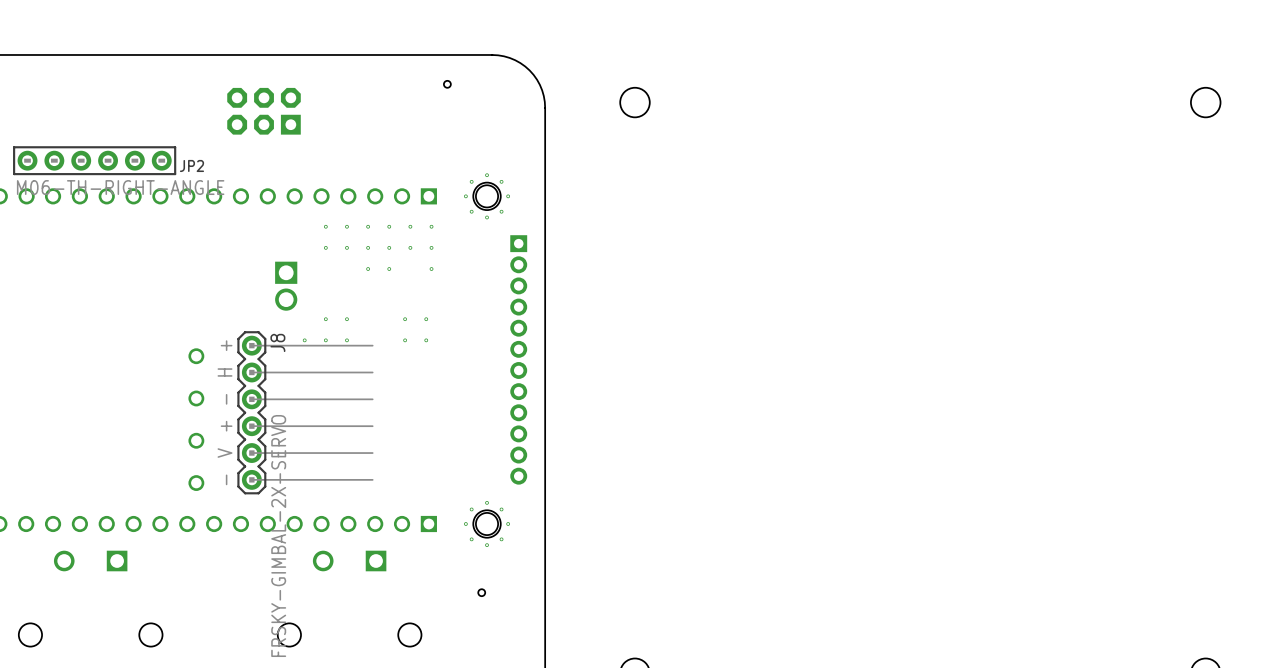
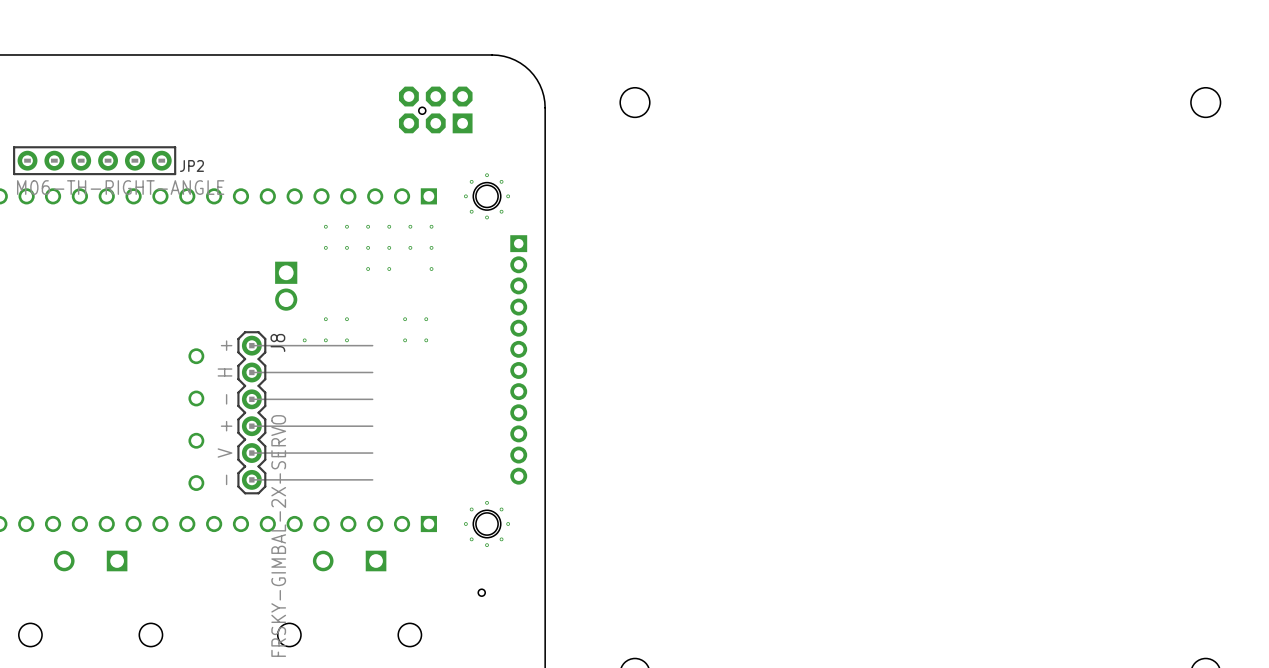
part position: (447, 84) -> (422, 110)
part position: (264, 111) -> (435, 109)

